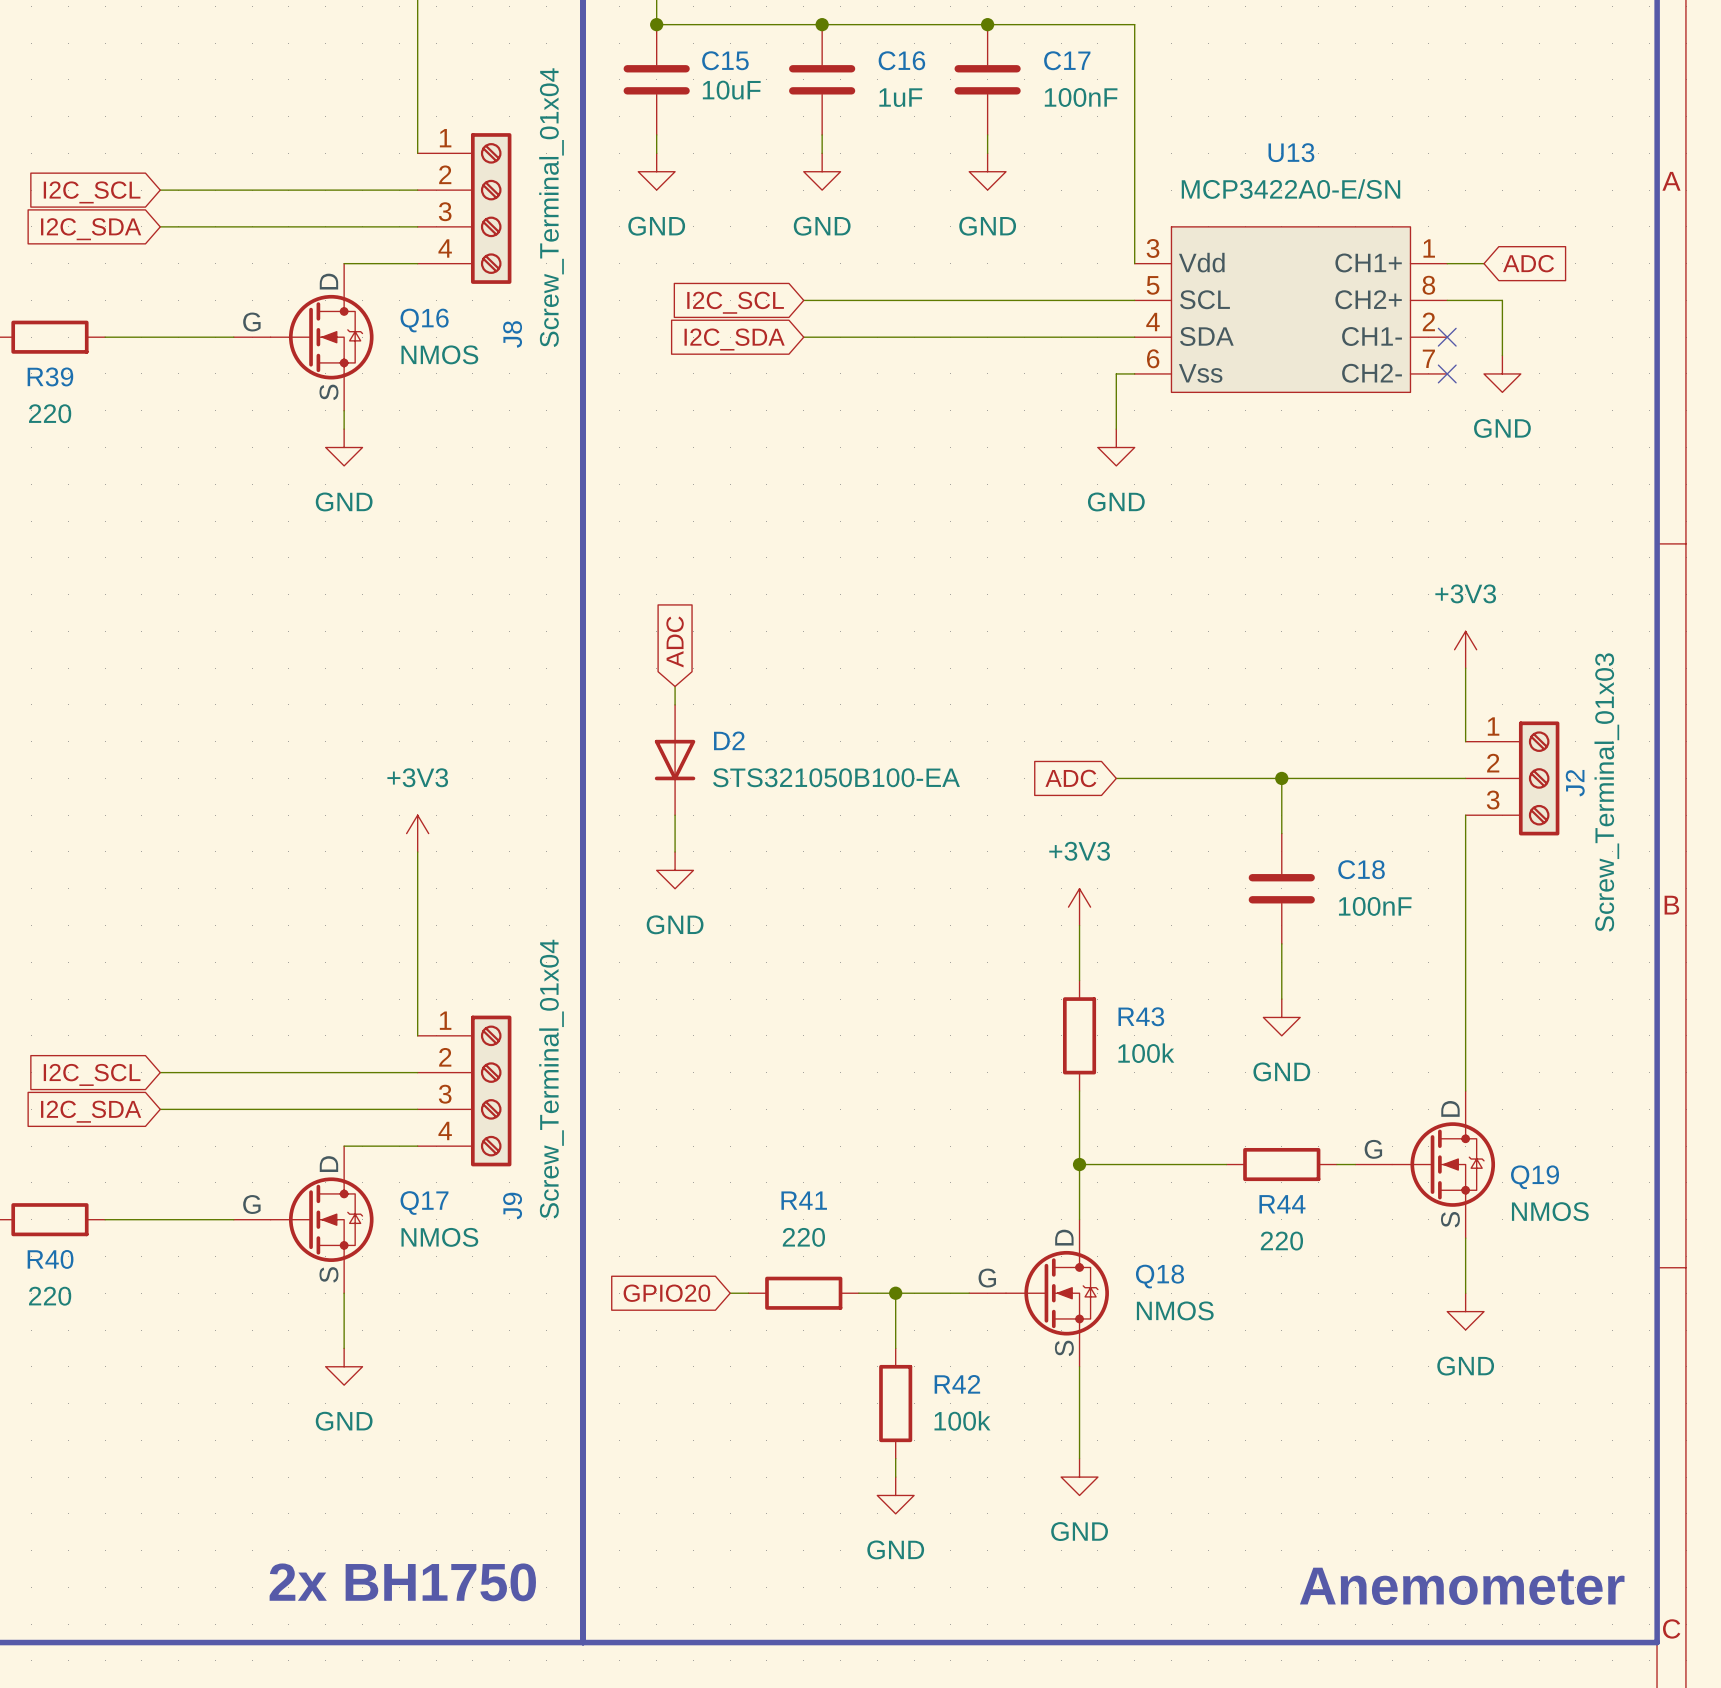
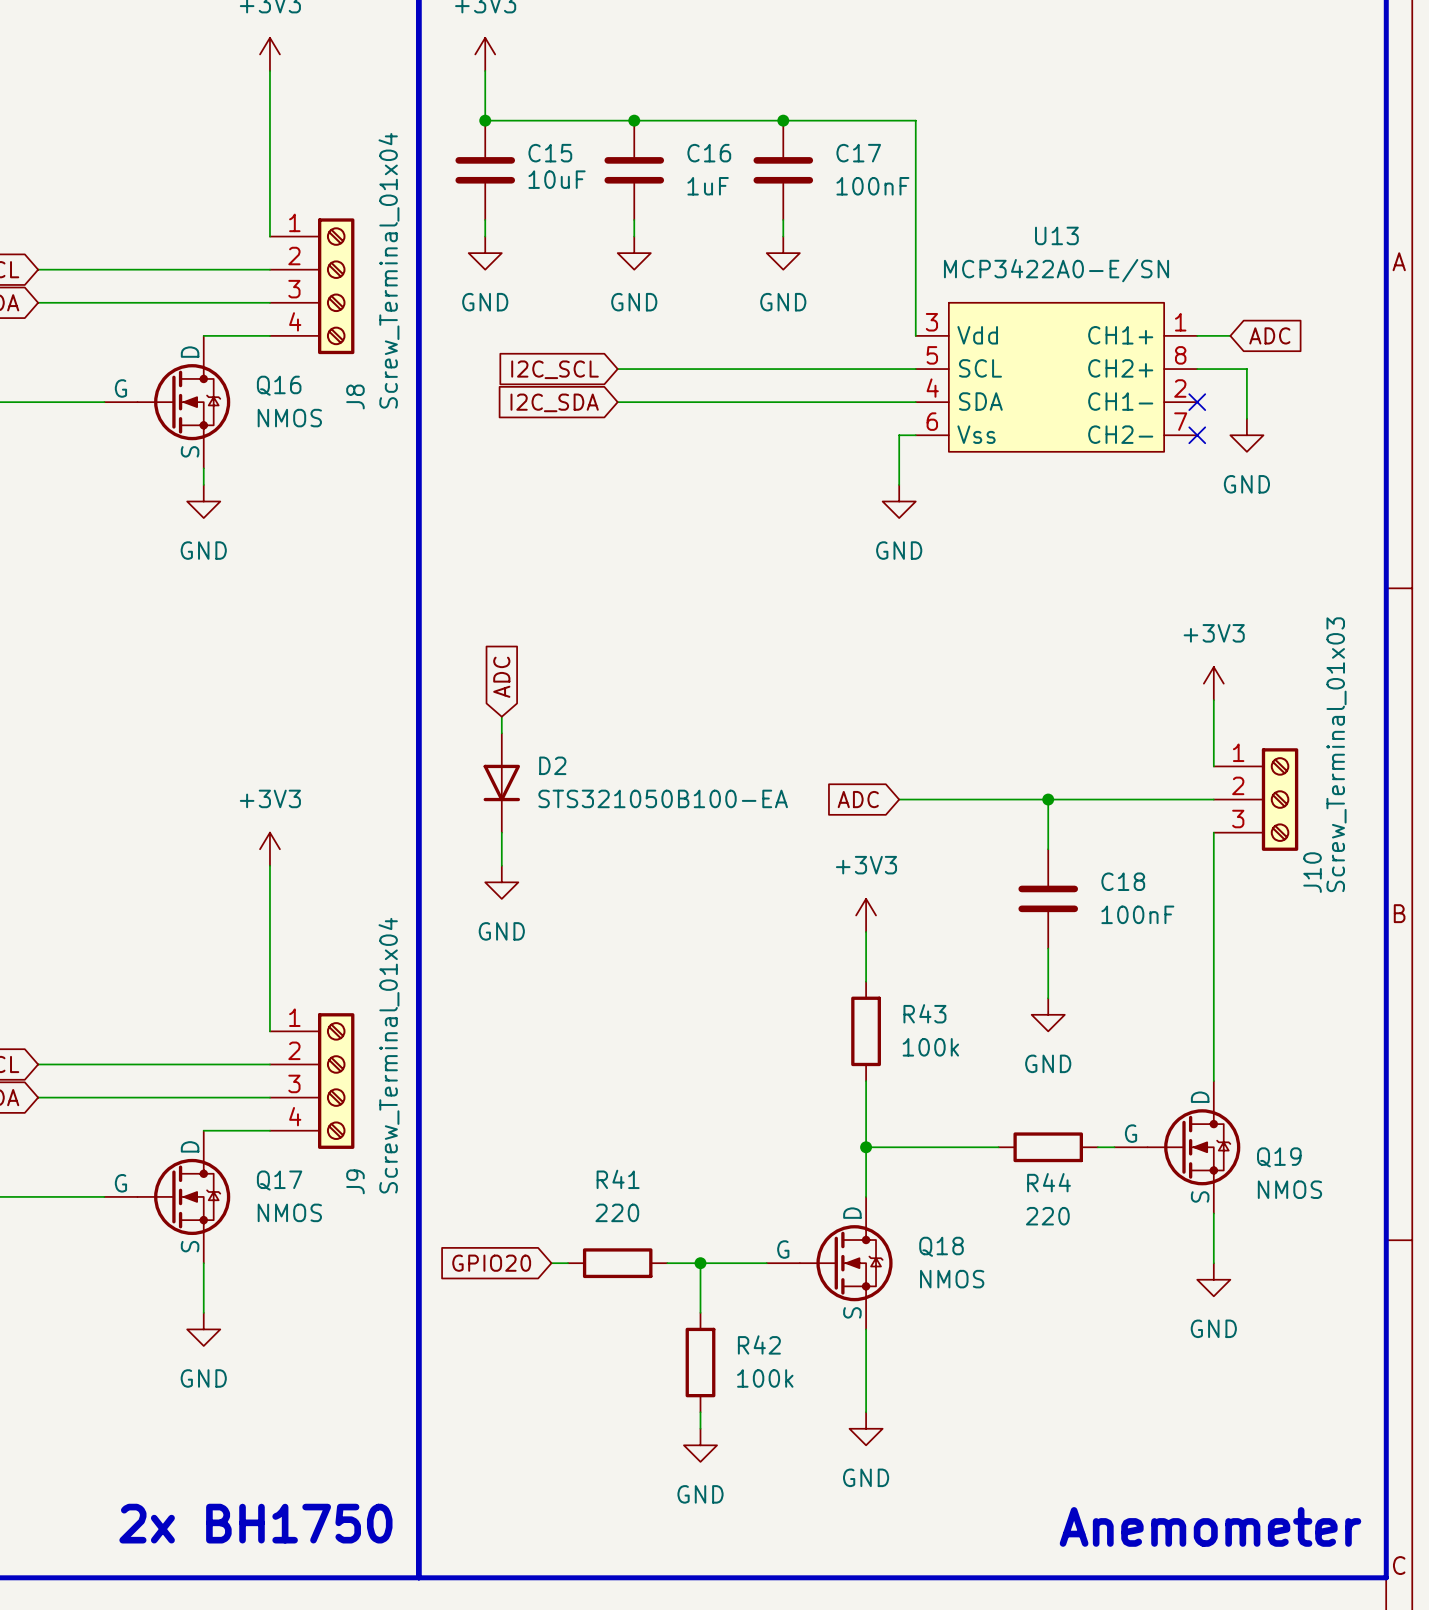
J2 name: J2 (1575, 783) -> J10 (1312, 872)
J2 value position: Screw_Terminal_01x03 (1606, 792) -> Screw_Terminal_01x03 (1336, 754)

